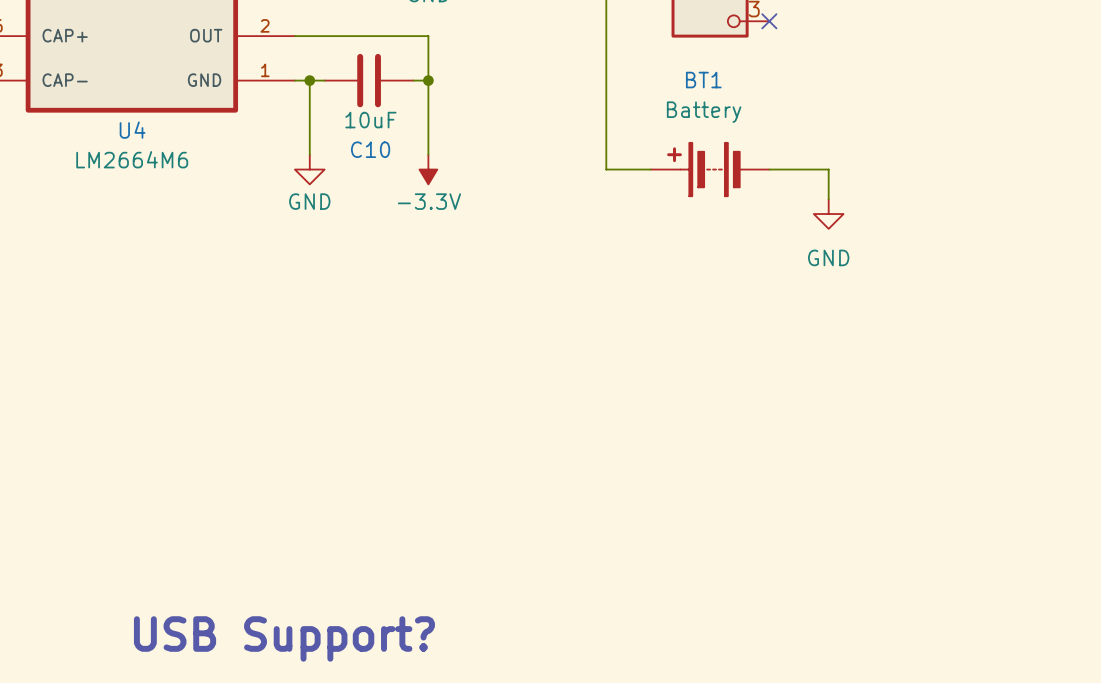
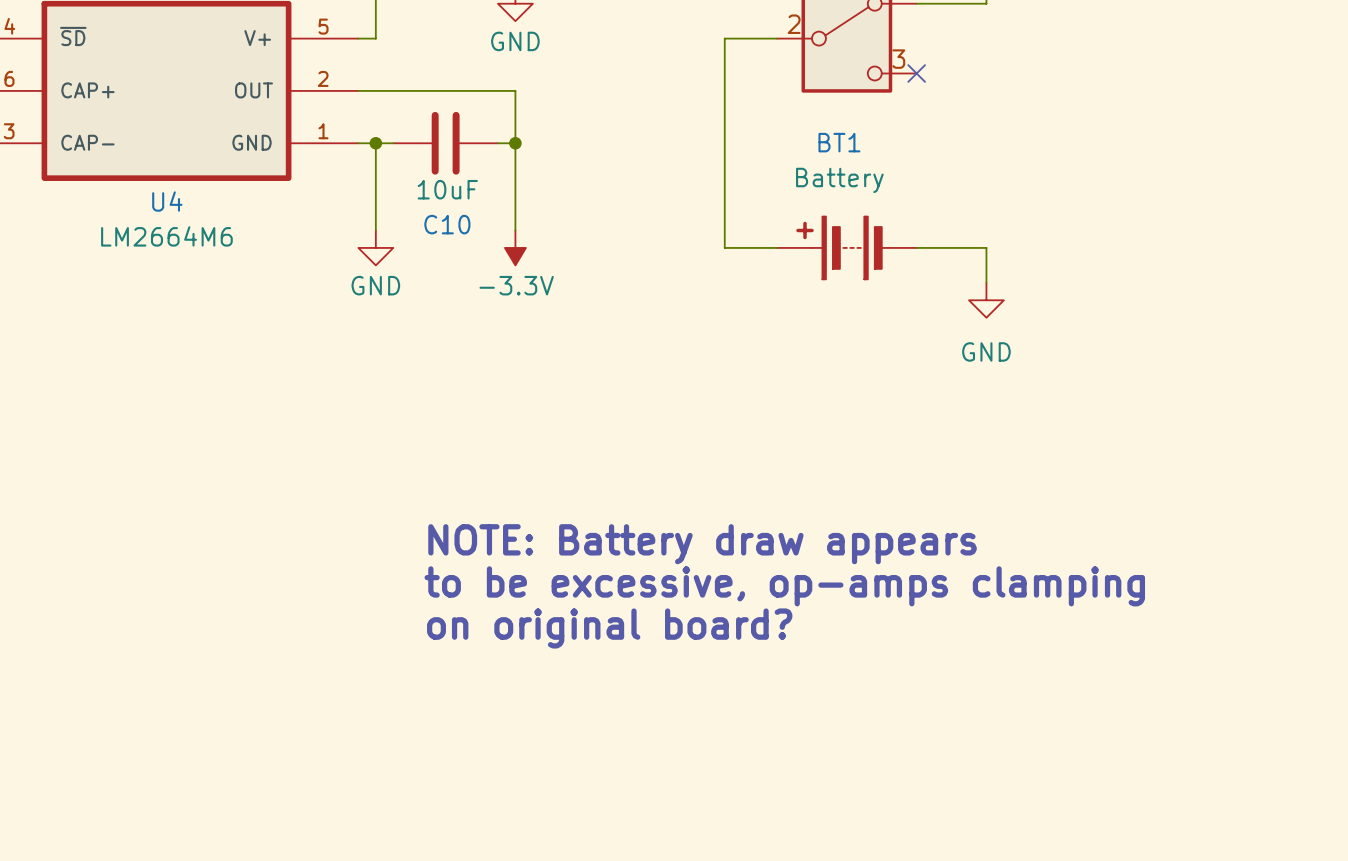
text: none -> NOTE: Battery draw appears (702, 544)
text: none -> to be excessive, op-amps clamping (784, 586)
text: none -> on original board? (609, 628)
text: USB Support? (284, 638) -> none

